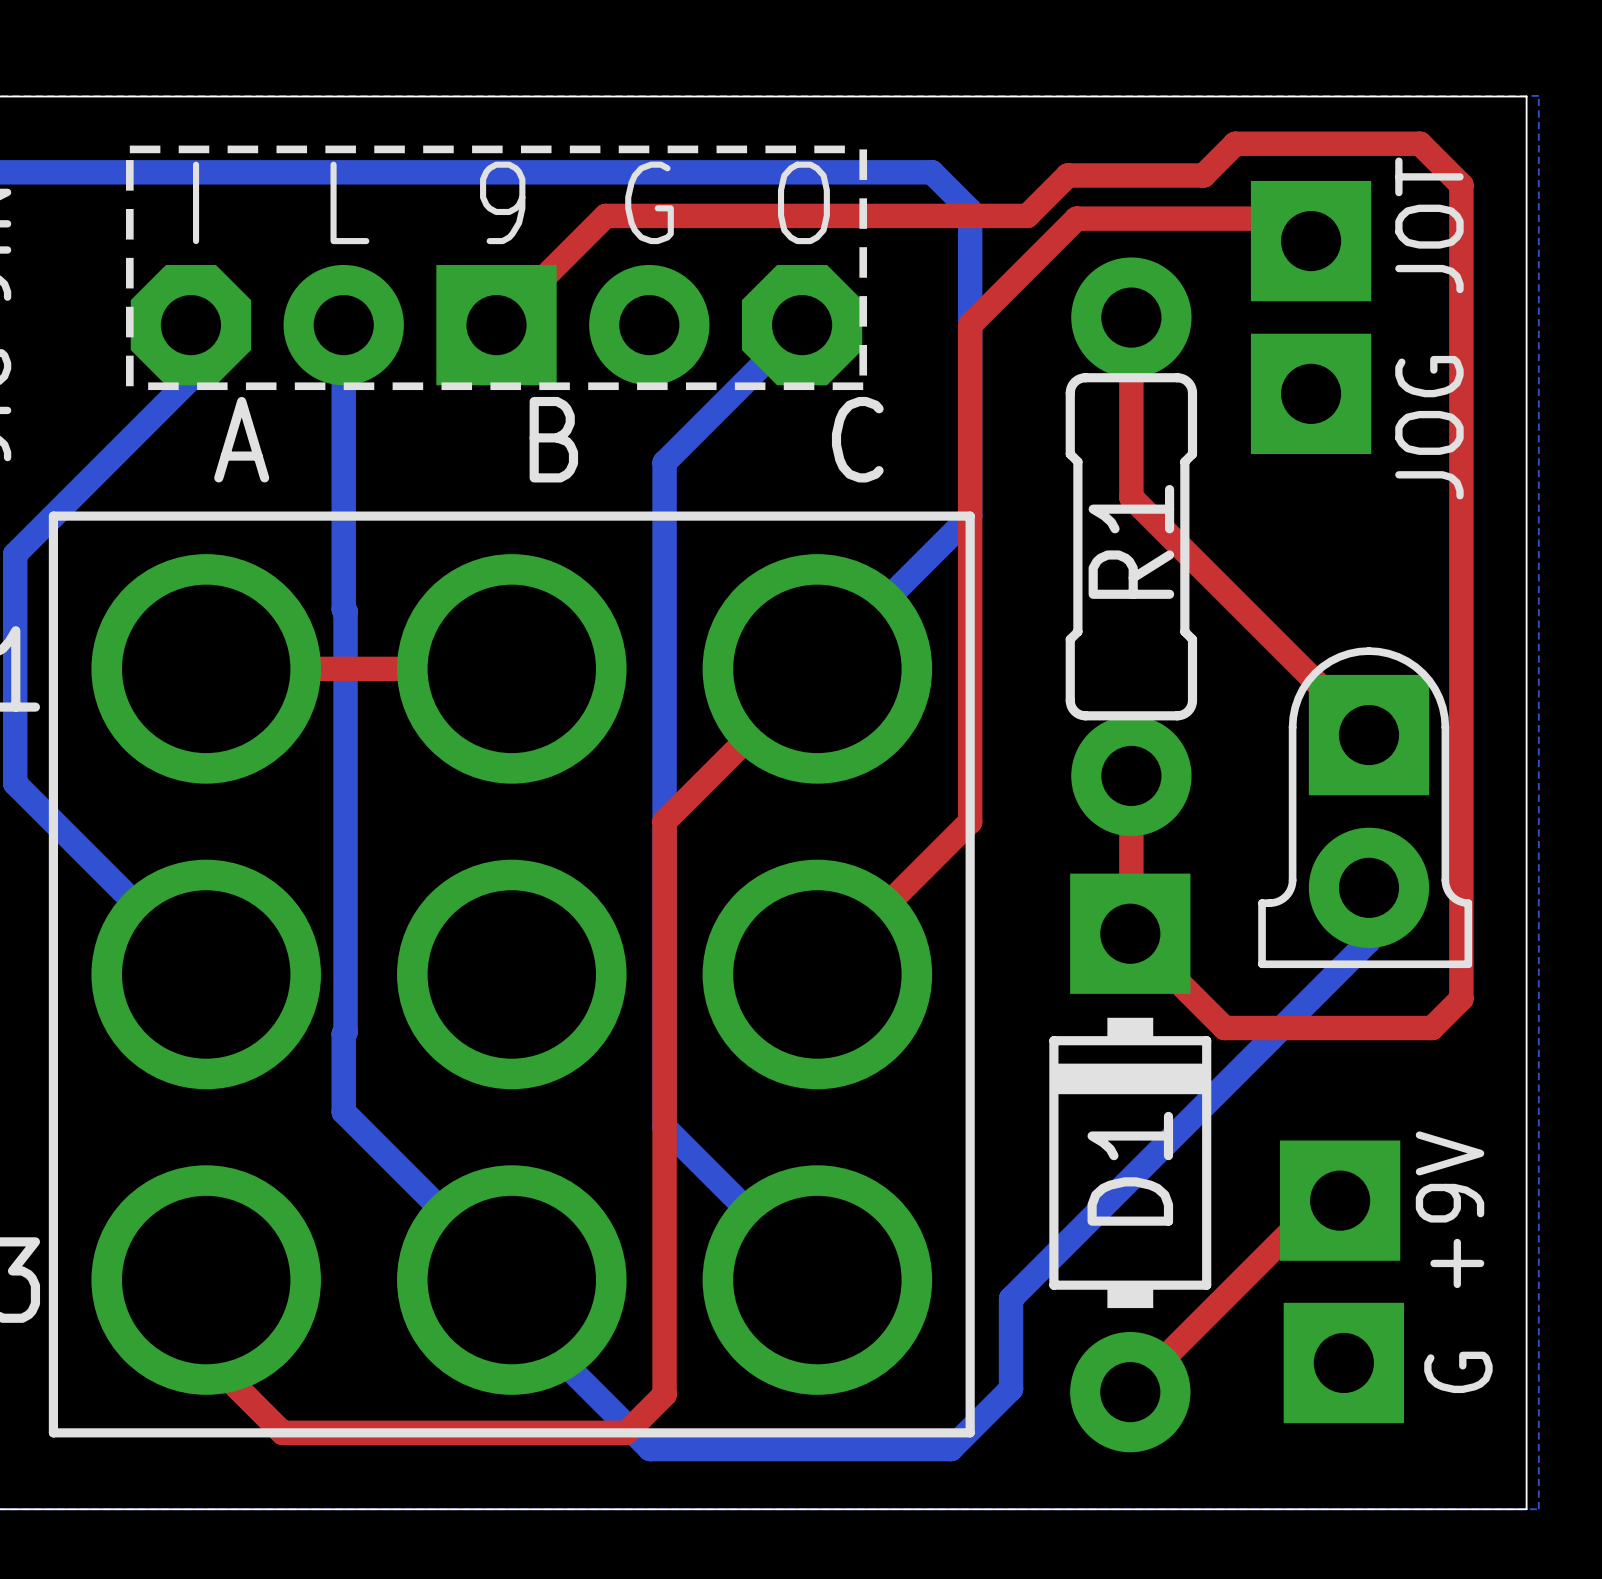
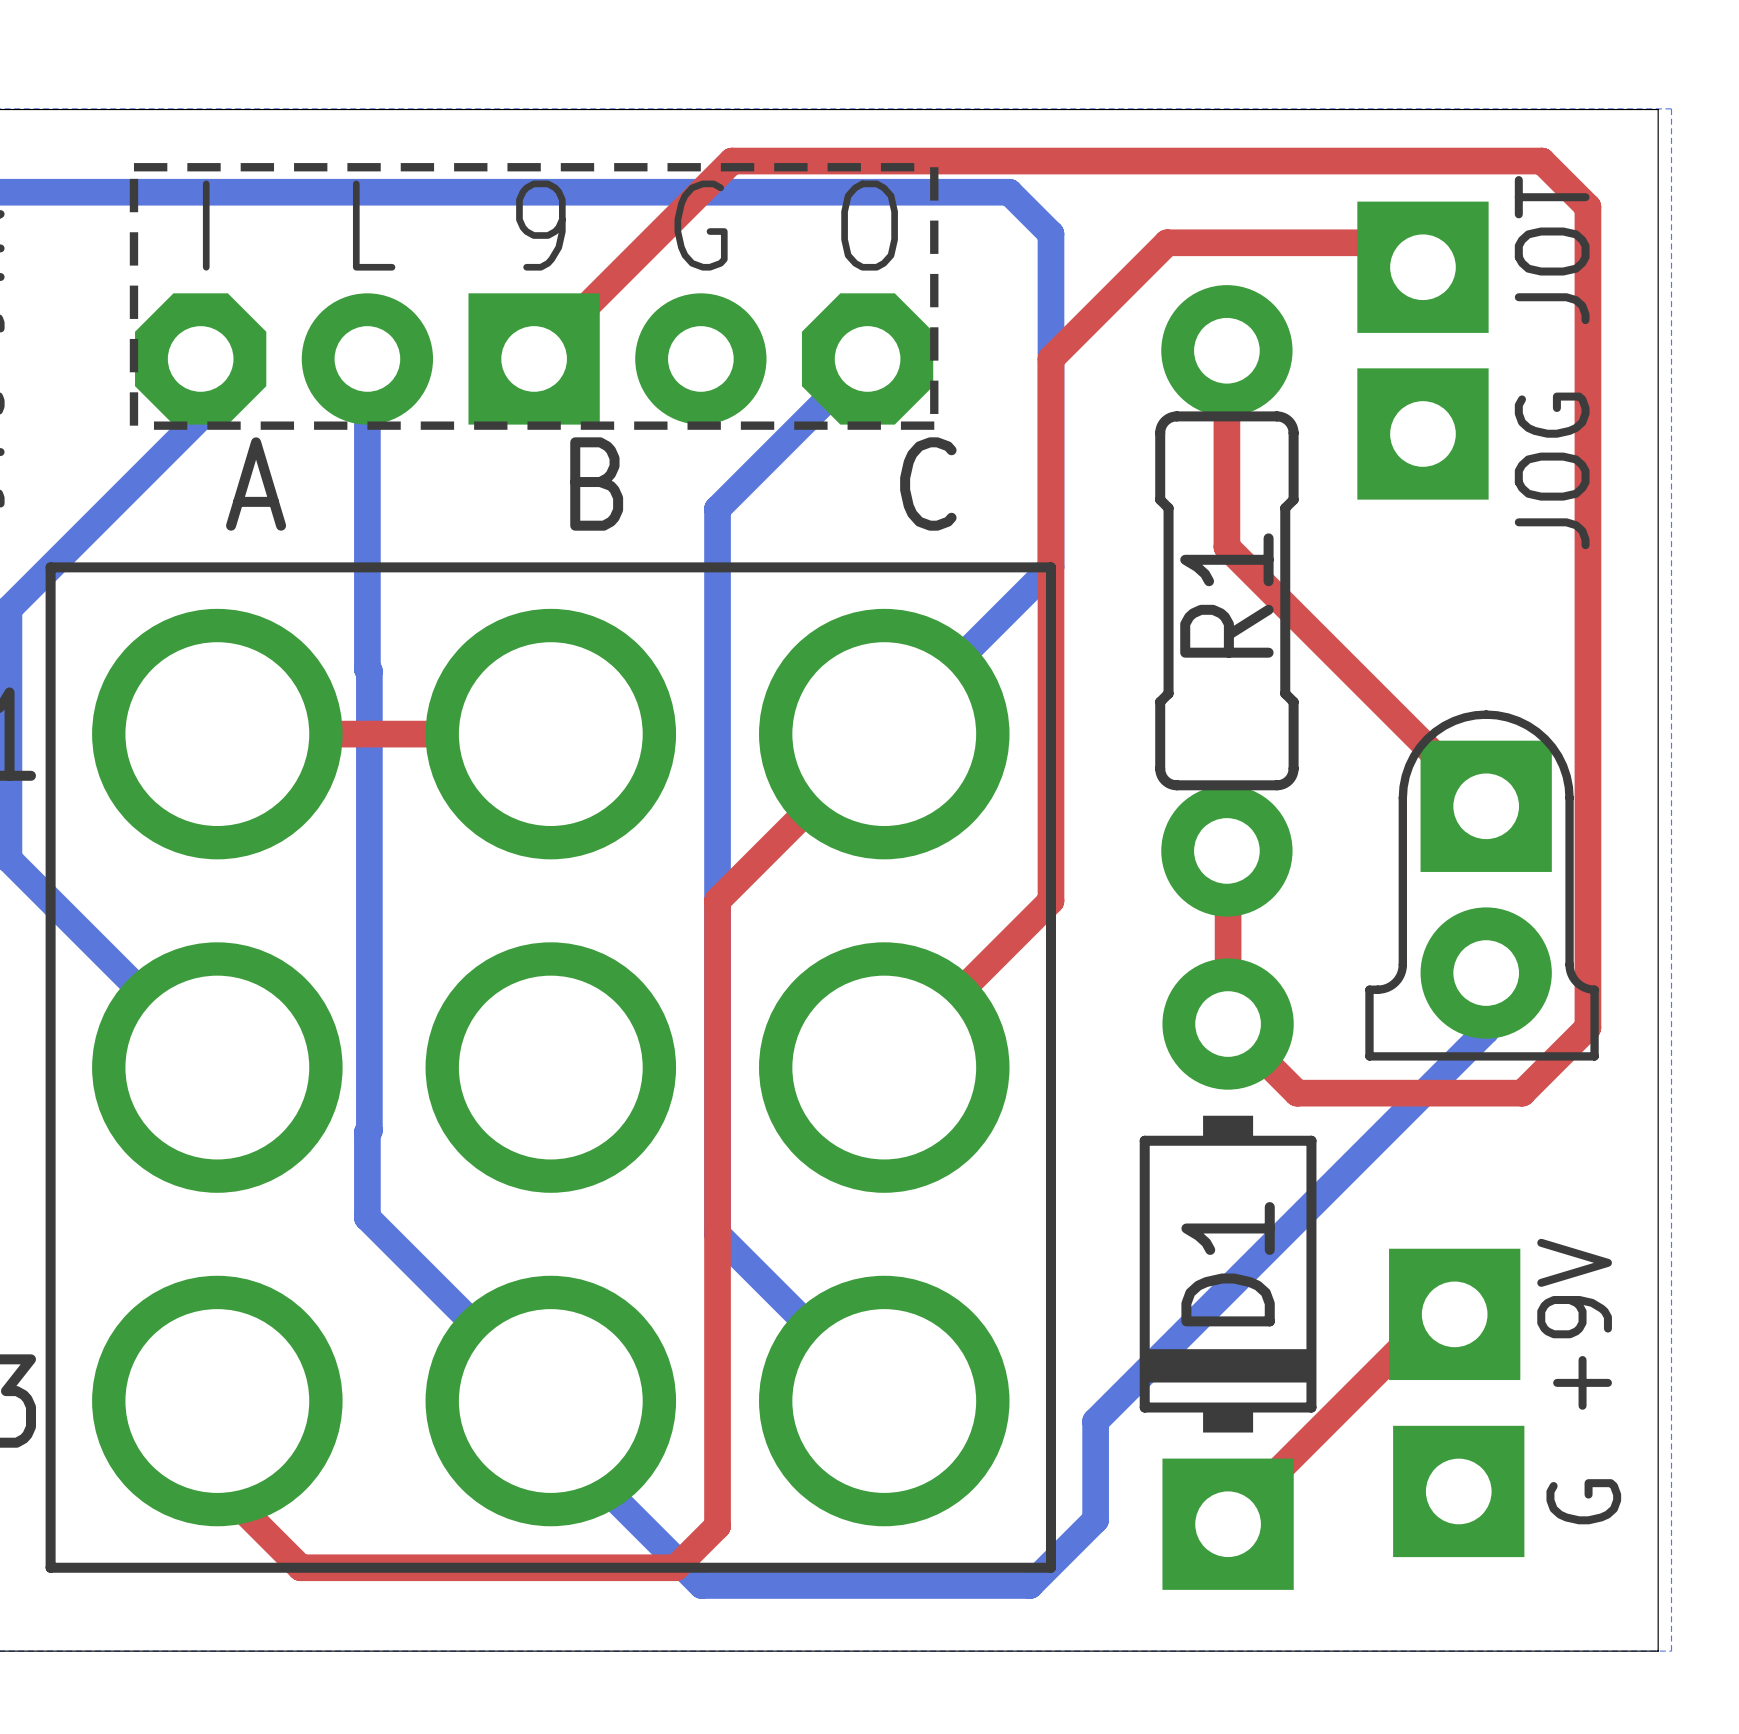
top track: (1235, 143) (1203, 175) (1067, 175) (1027, 215) (605, 215) -> (1340, 161) (732, 161) (653, 239)
top track: (1461, 185) (1461, 998) (1432, 1028) (1224, 1028) (1130, 933) (1131, 775) -> (1587, 206) (1587, 1027) (1522, 1093) (1297, 1093) (1228, 1024) (1226, 850)
D1 rotation: 0° (1130, 1162) -> 180° (1228, 1274)

